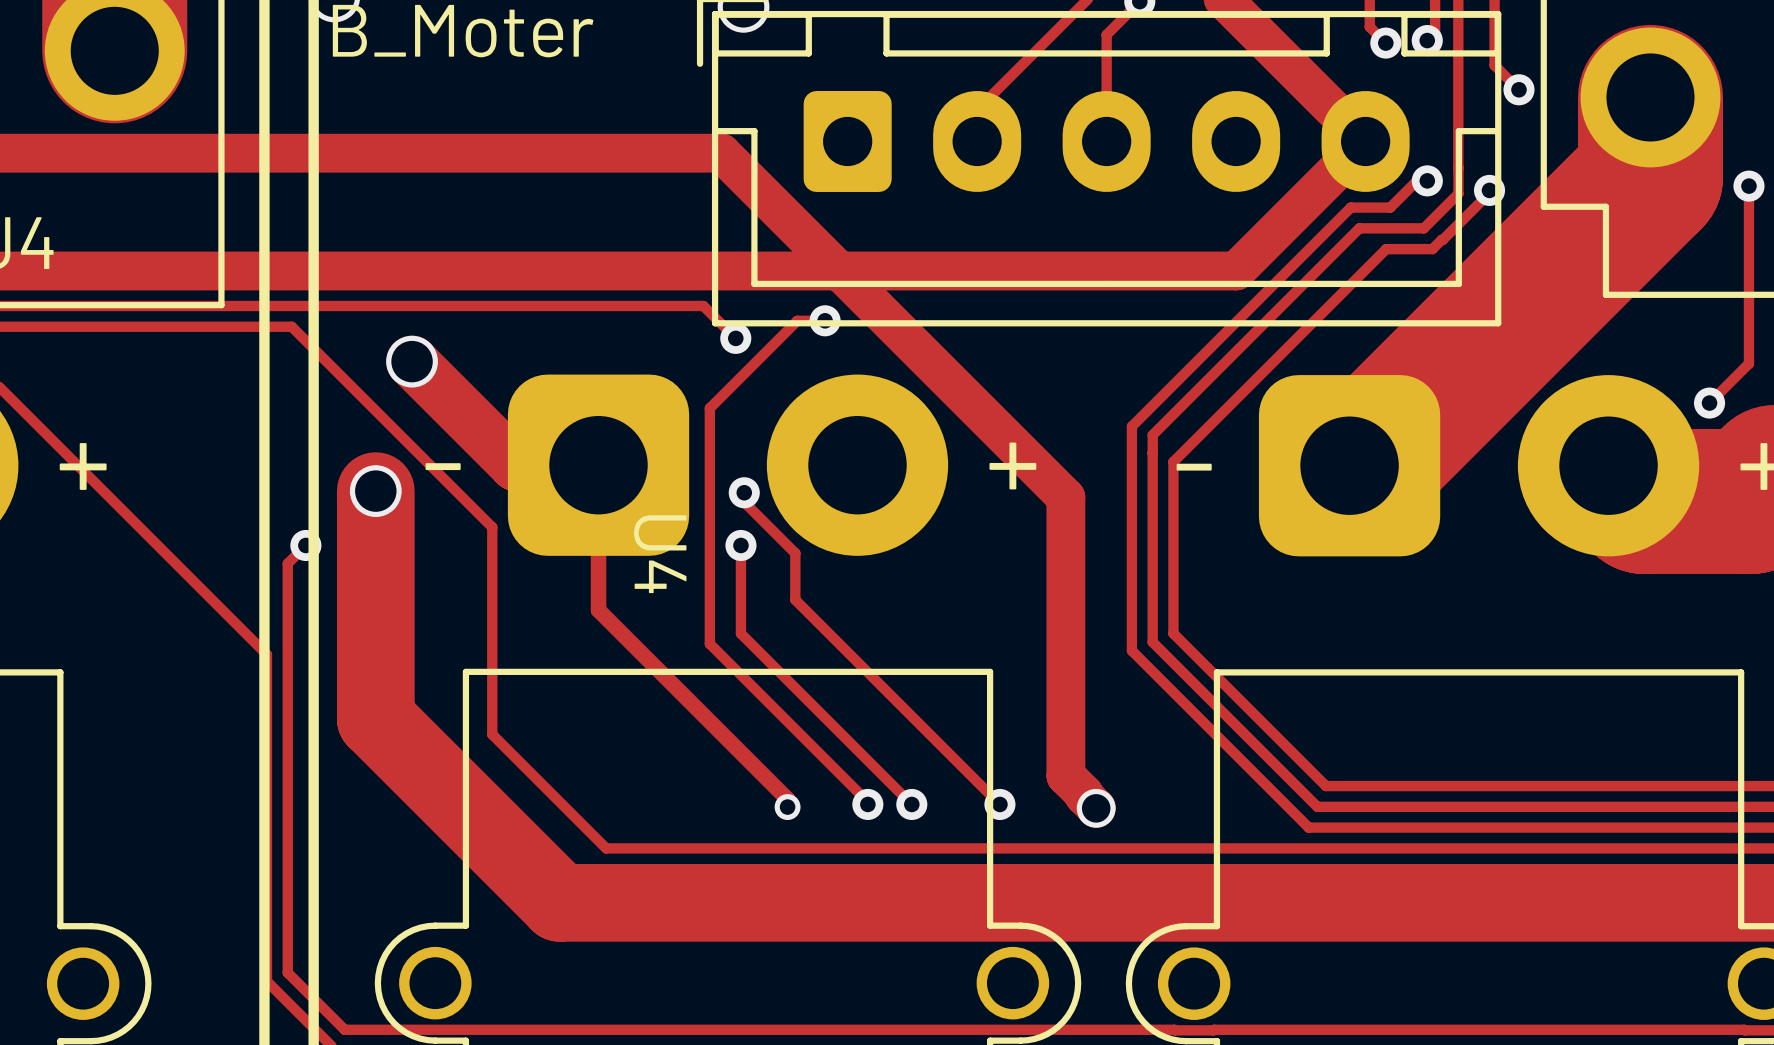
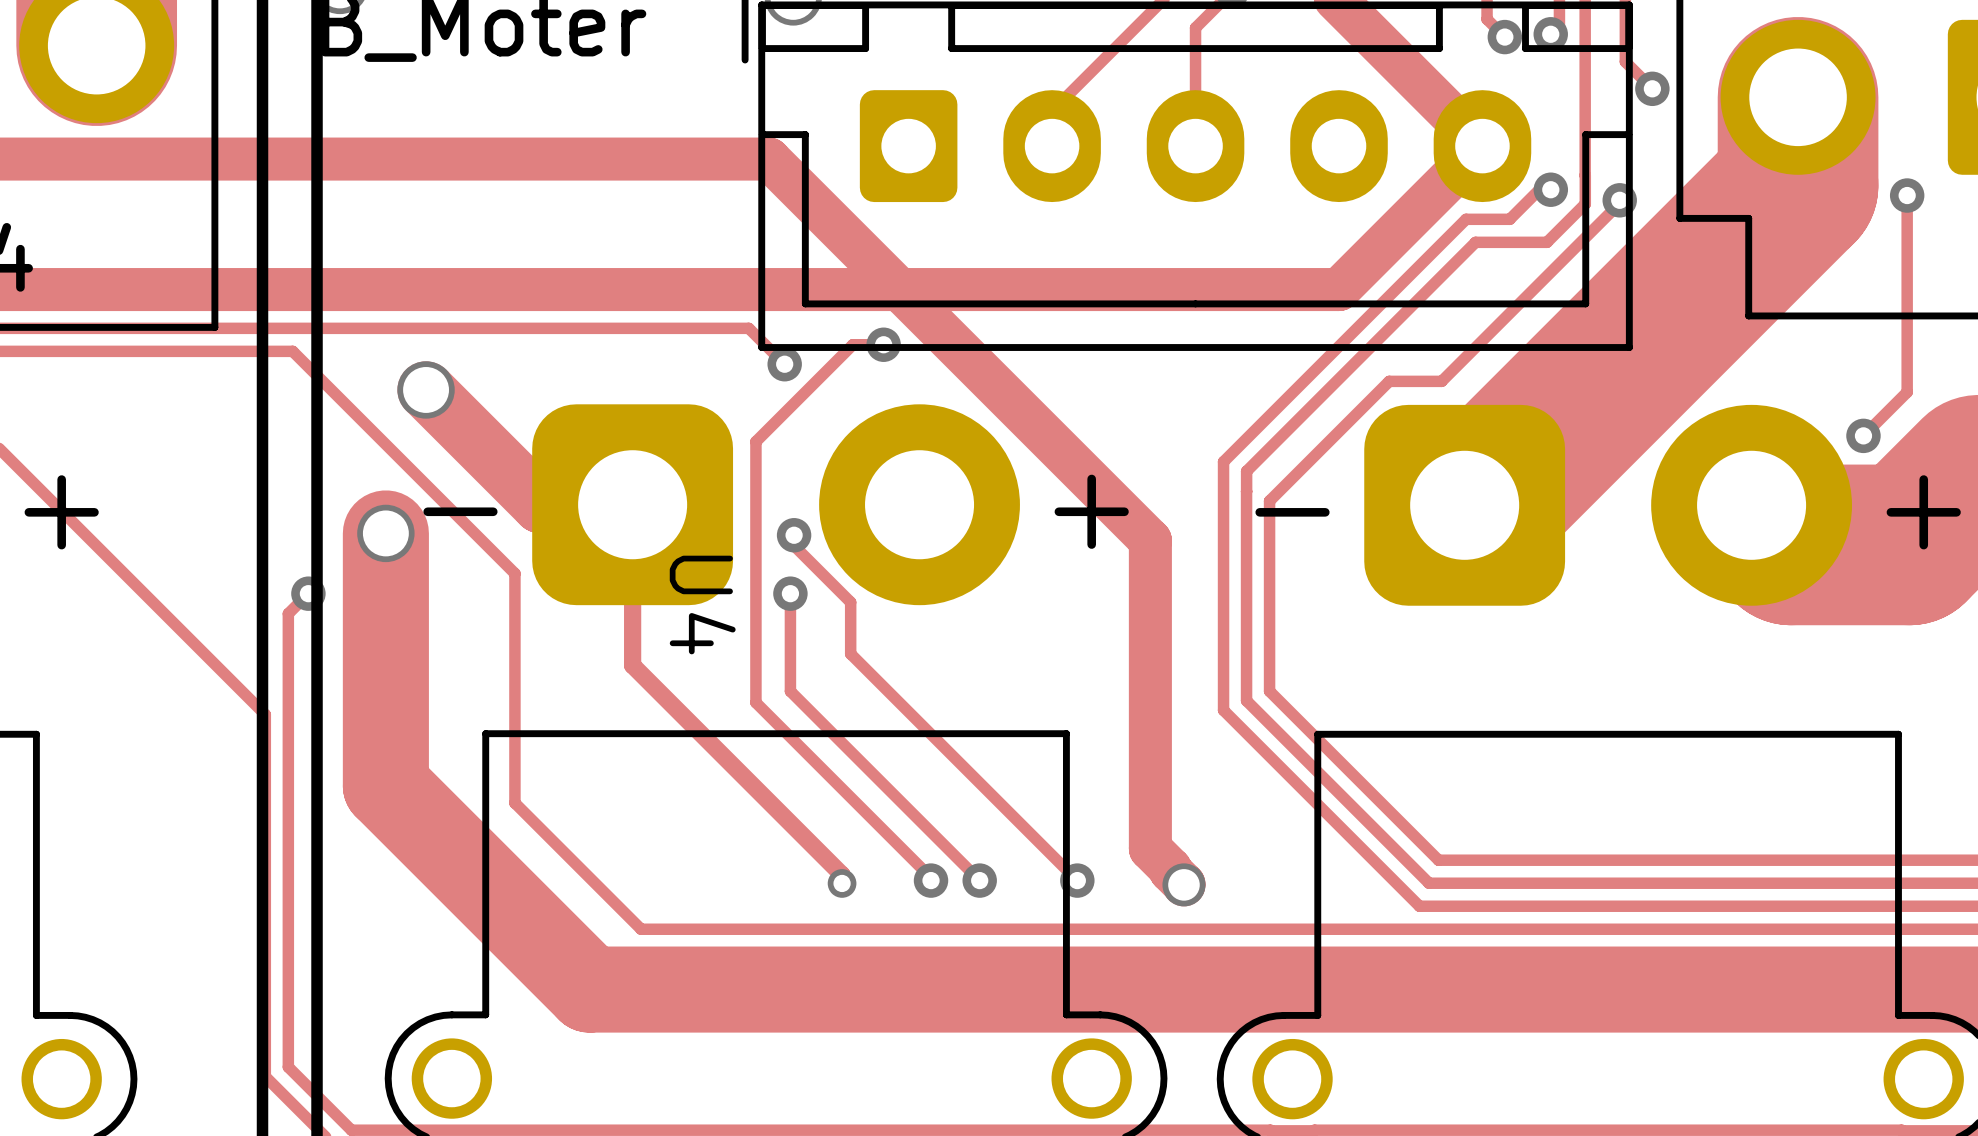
track: (1442, 239) (1432, 249) (1386, 249) (1281, 353) -> (1567, 255) (1441, 381) (1389, 381)

